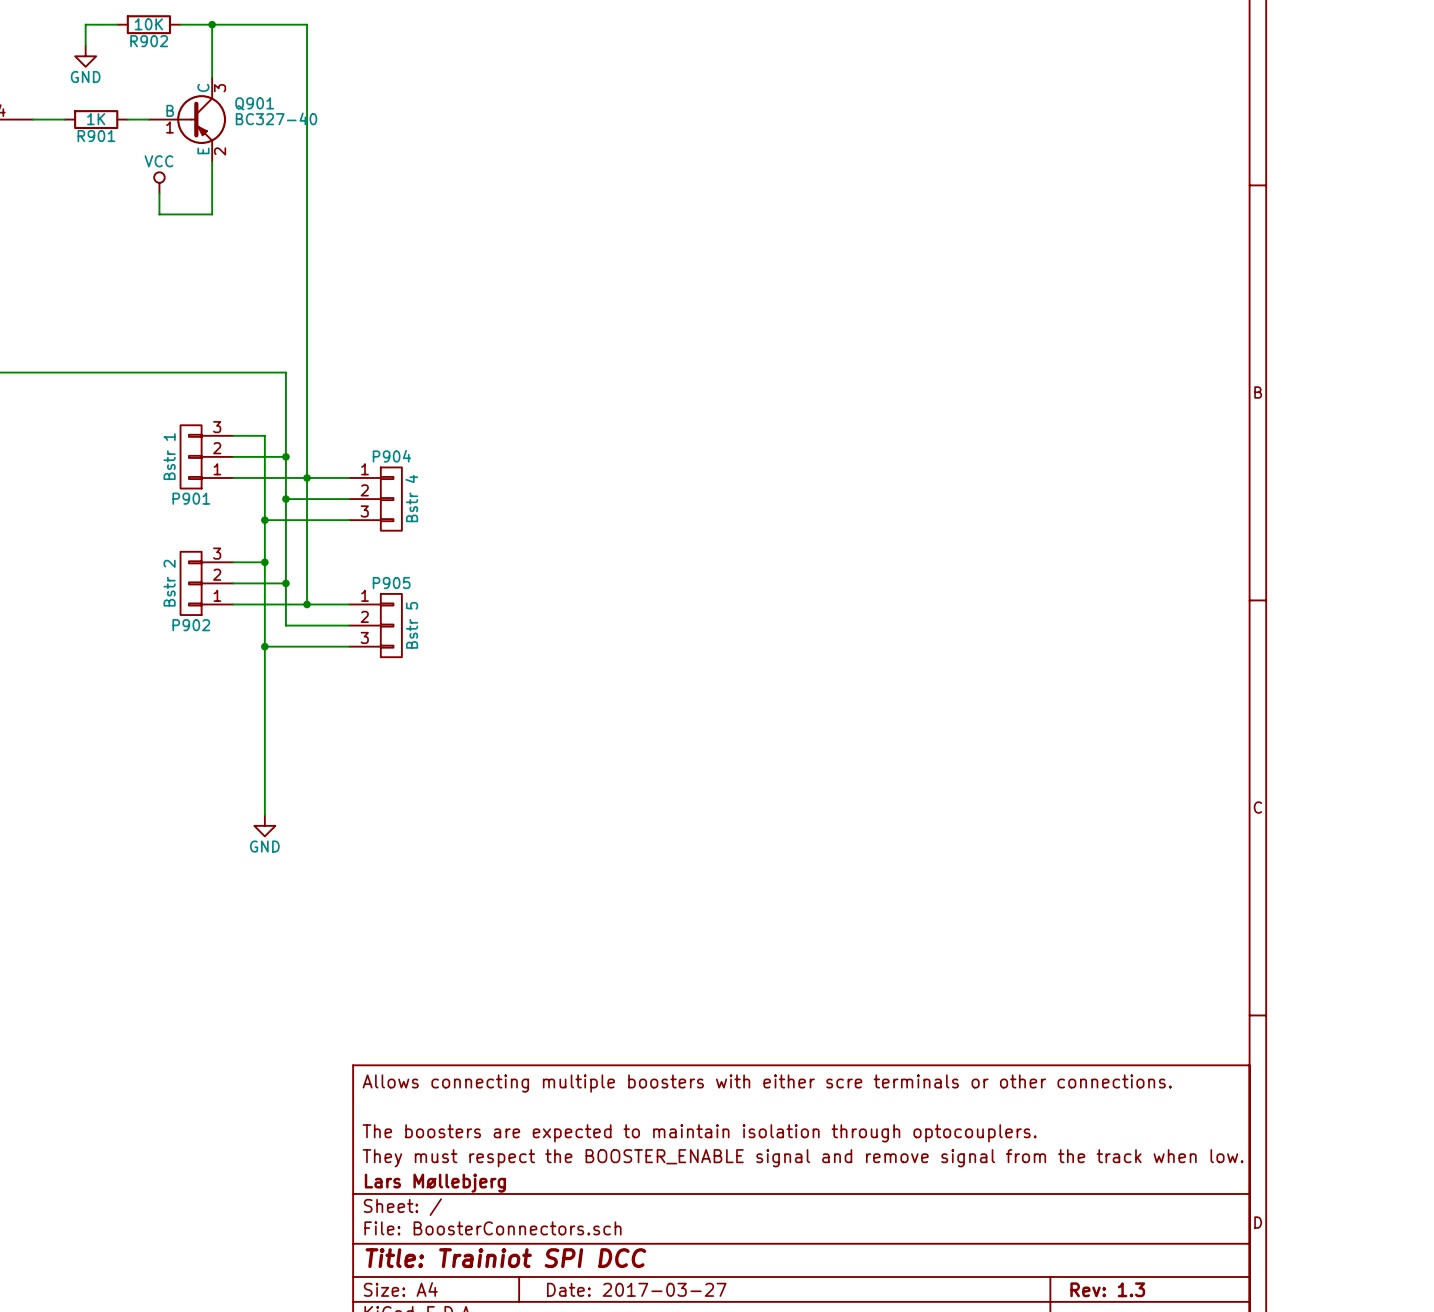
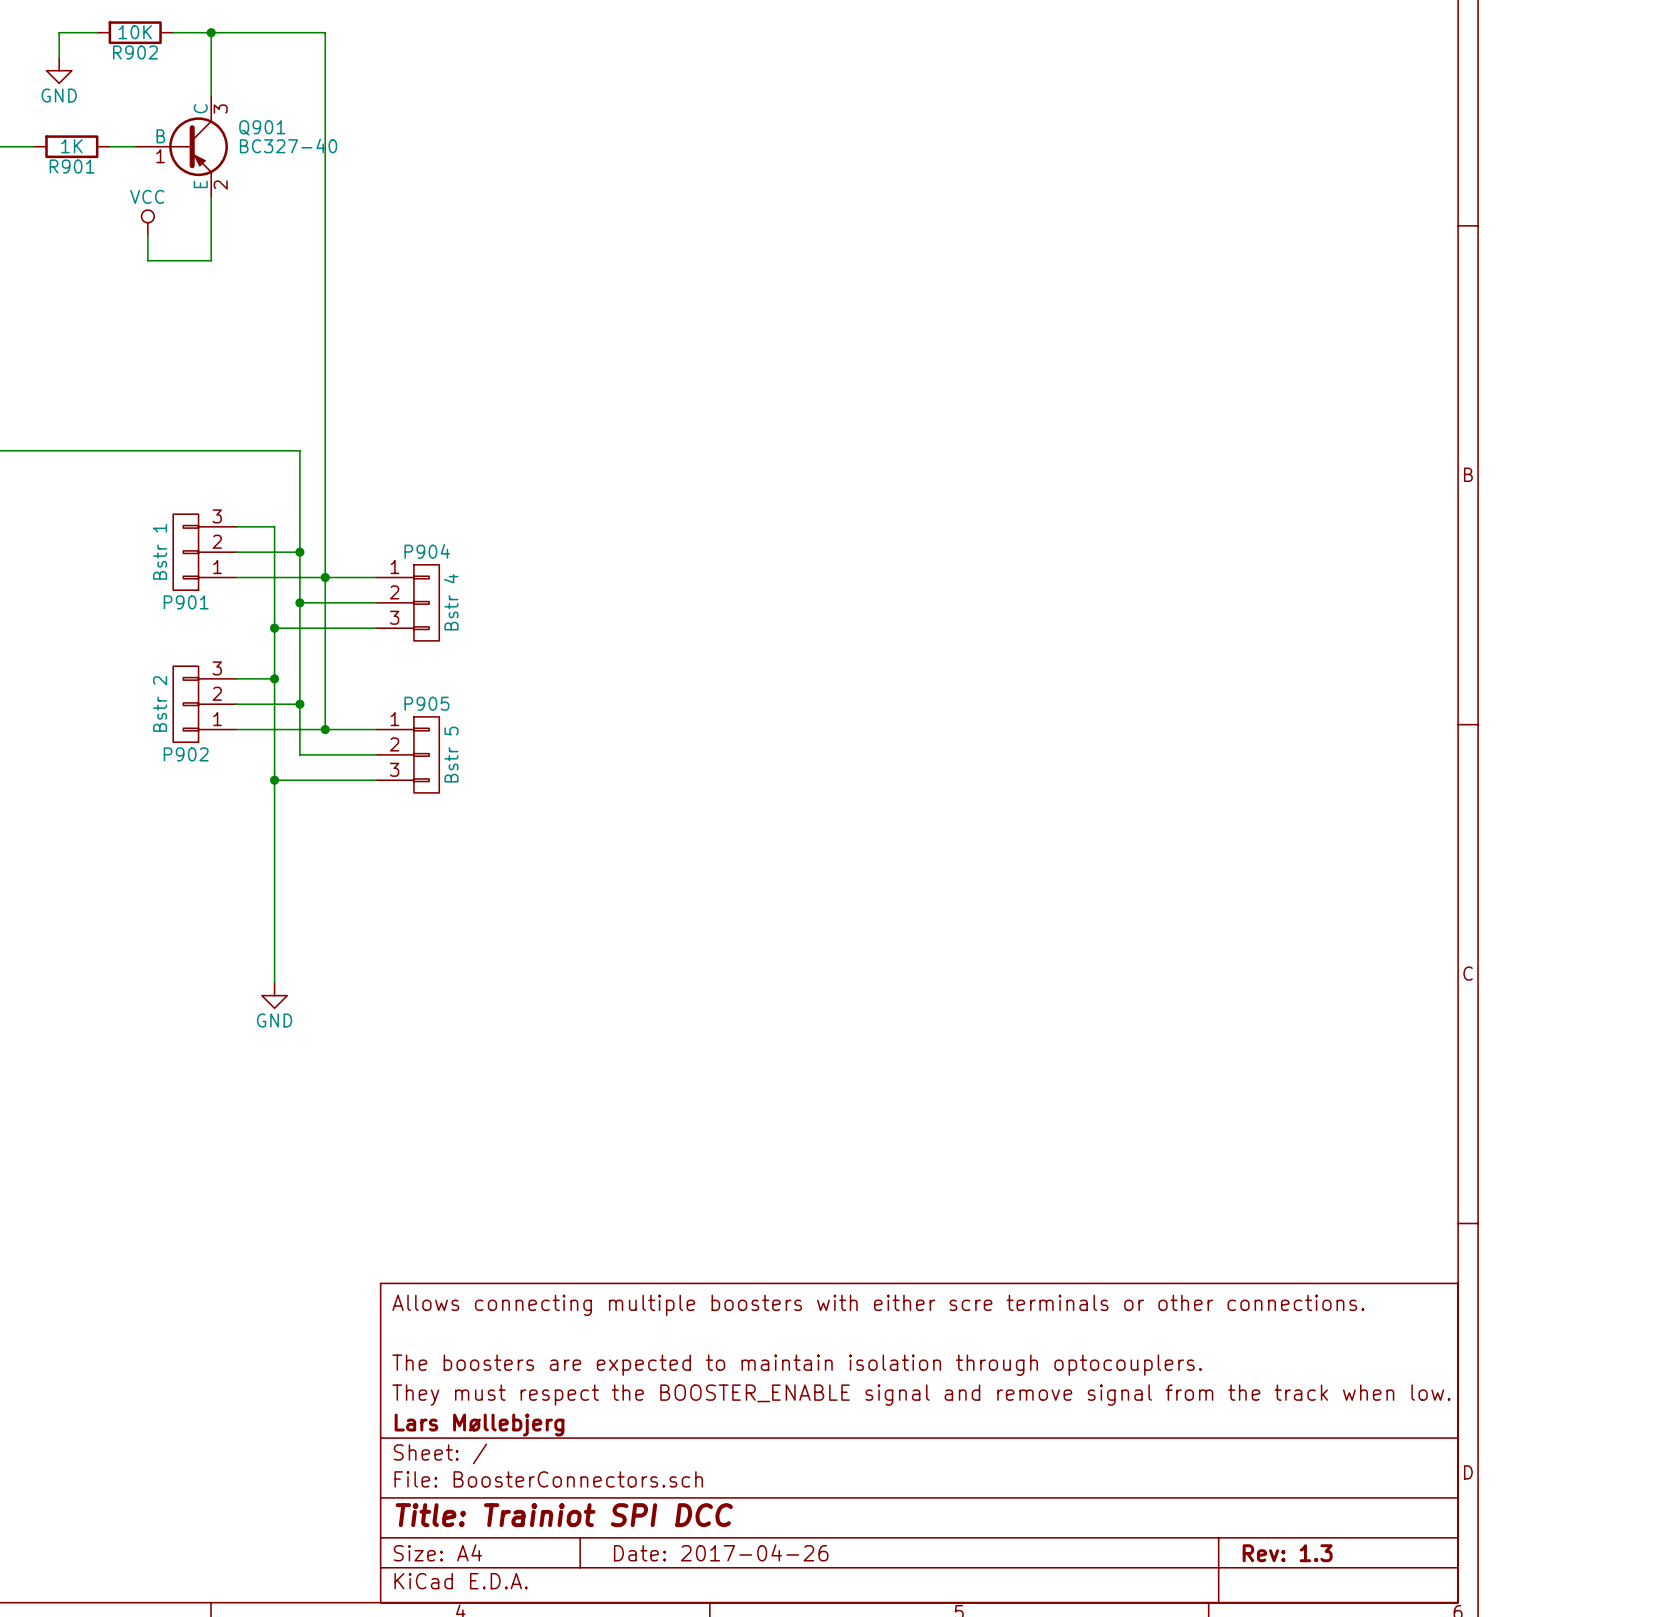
title block: Date: 2017-03-27 (636, 1289) -> Date: 2017-04-26 (721, 1552)

